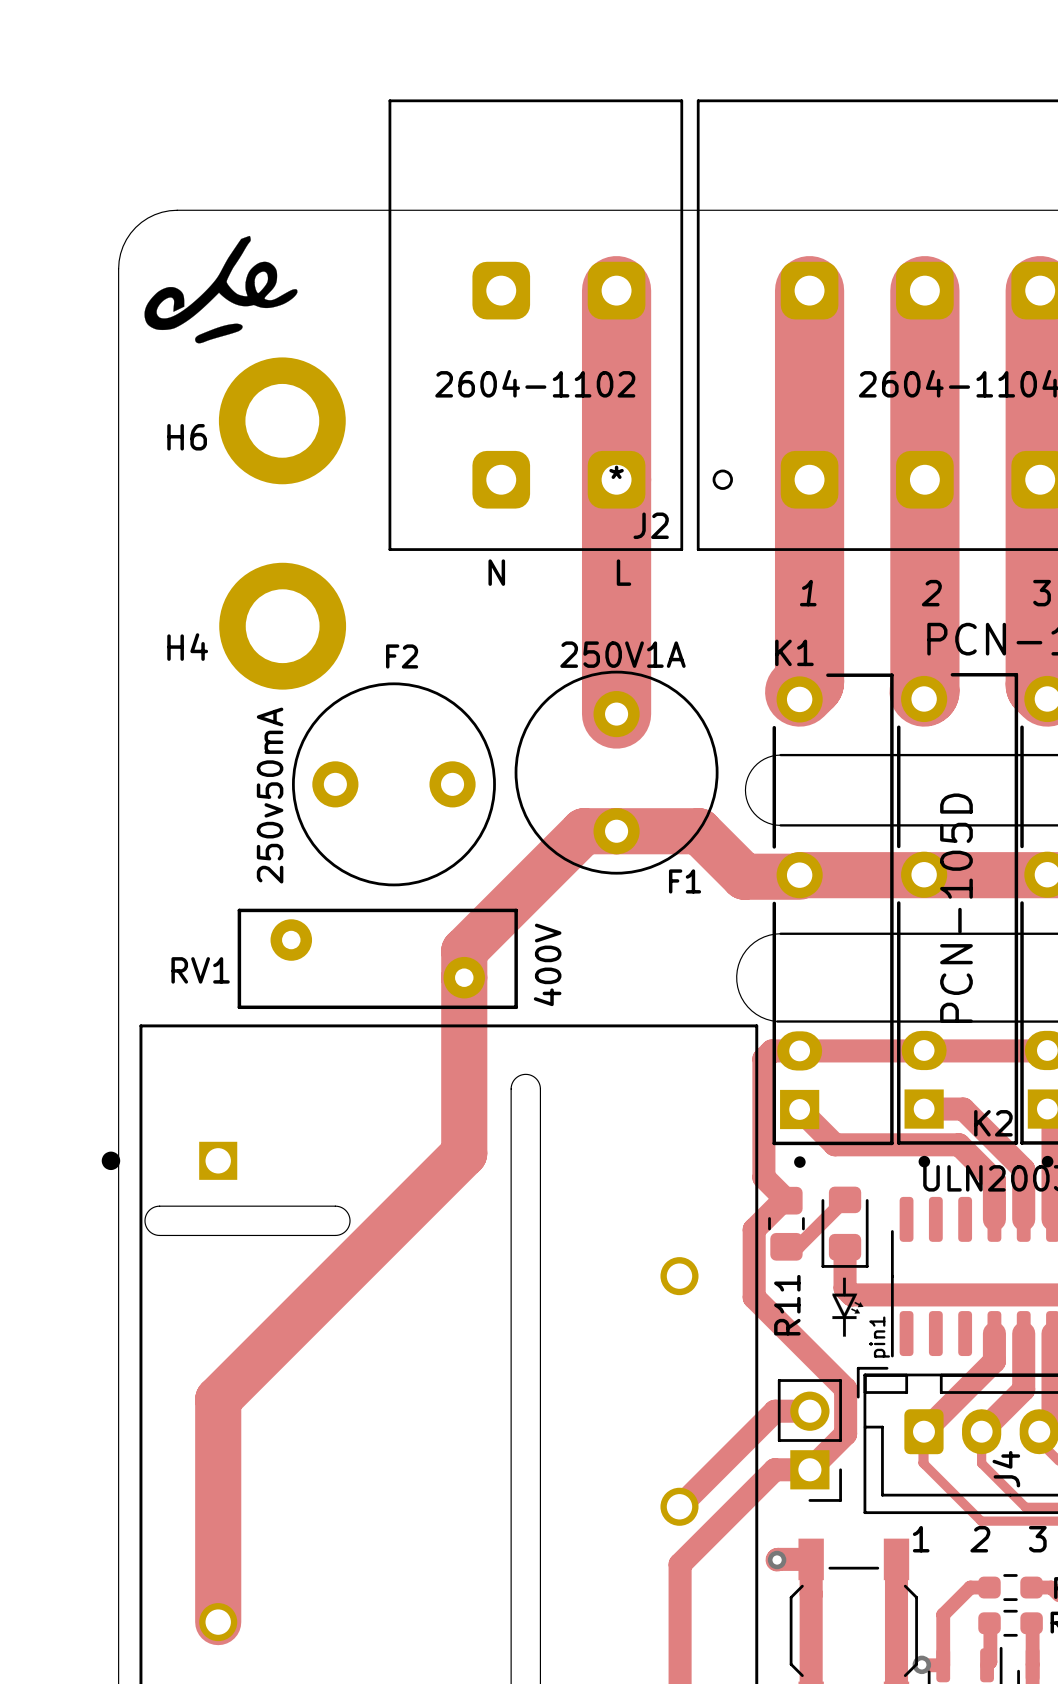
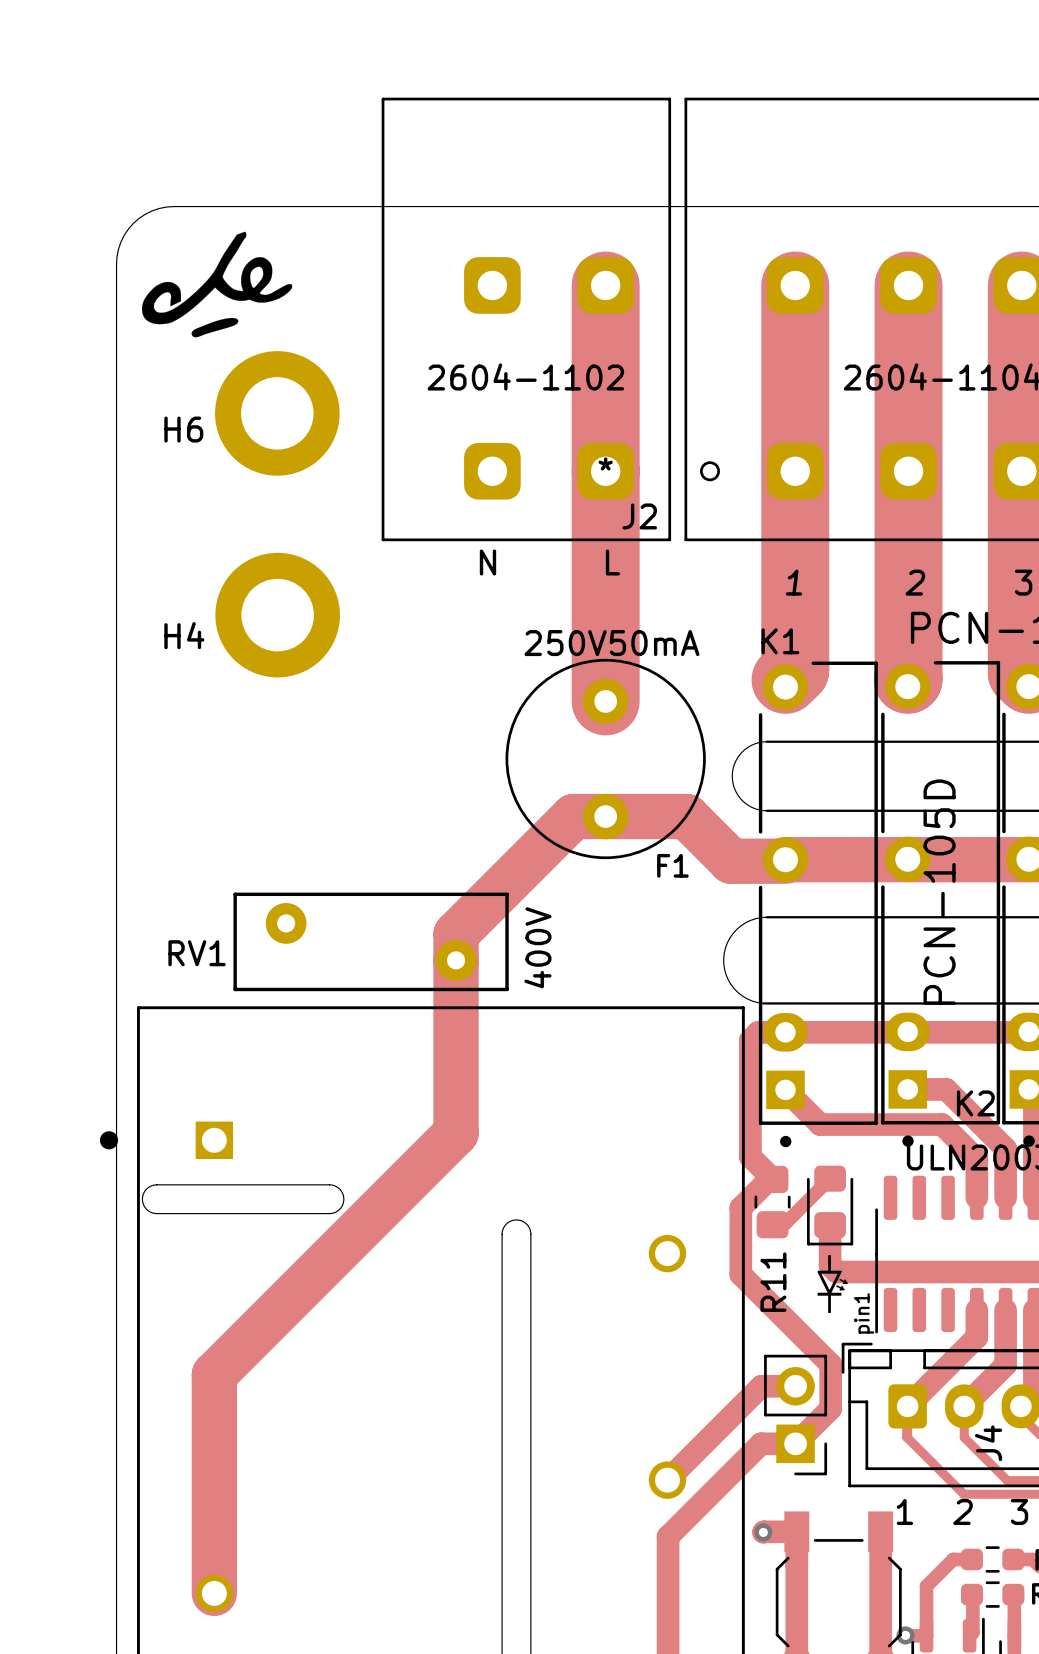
F1 value: 250V1A (622, 654) -> 250V50mA (611, 643)
F2: 250v50mA (393, 784) -> none
board edge: (511, 1256) (511, 1087) (516, 1078) (525, 1074) (535, 1078) (540, 1087) (540, 1256) -> (502, 1234) (505, 1224) (516, 1219) (526, 1223) (530, 1234)

